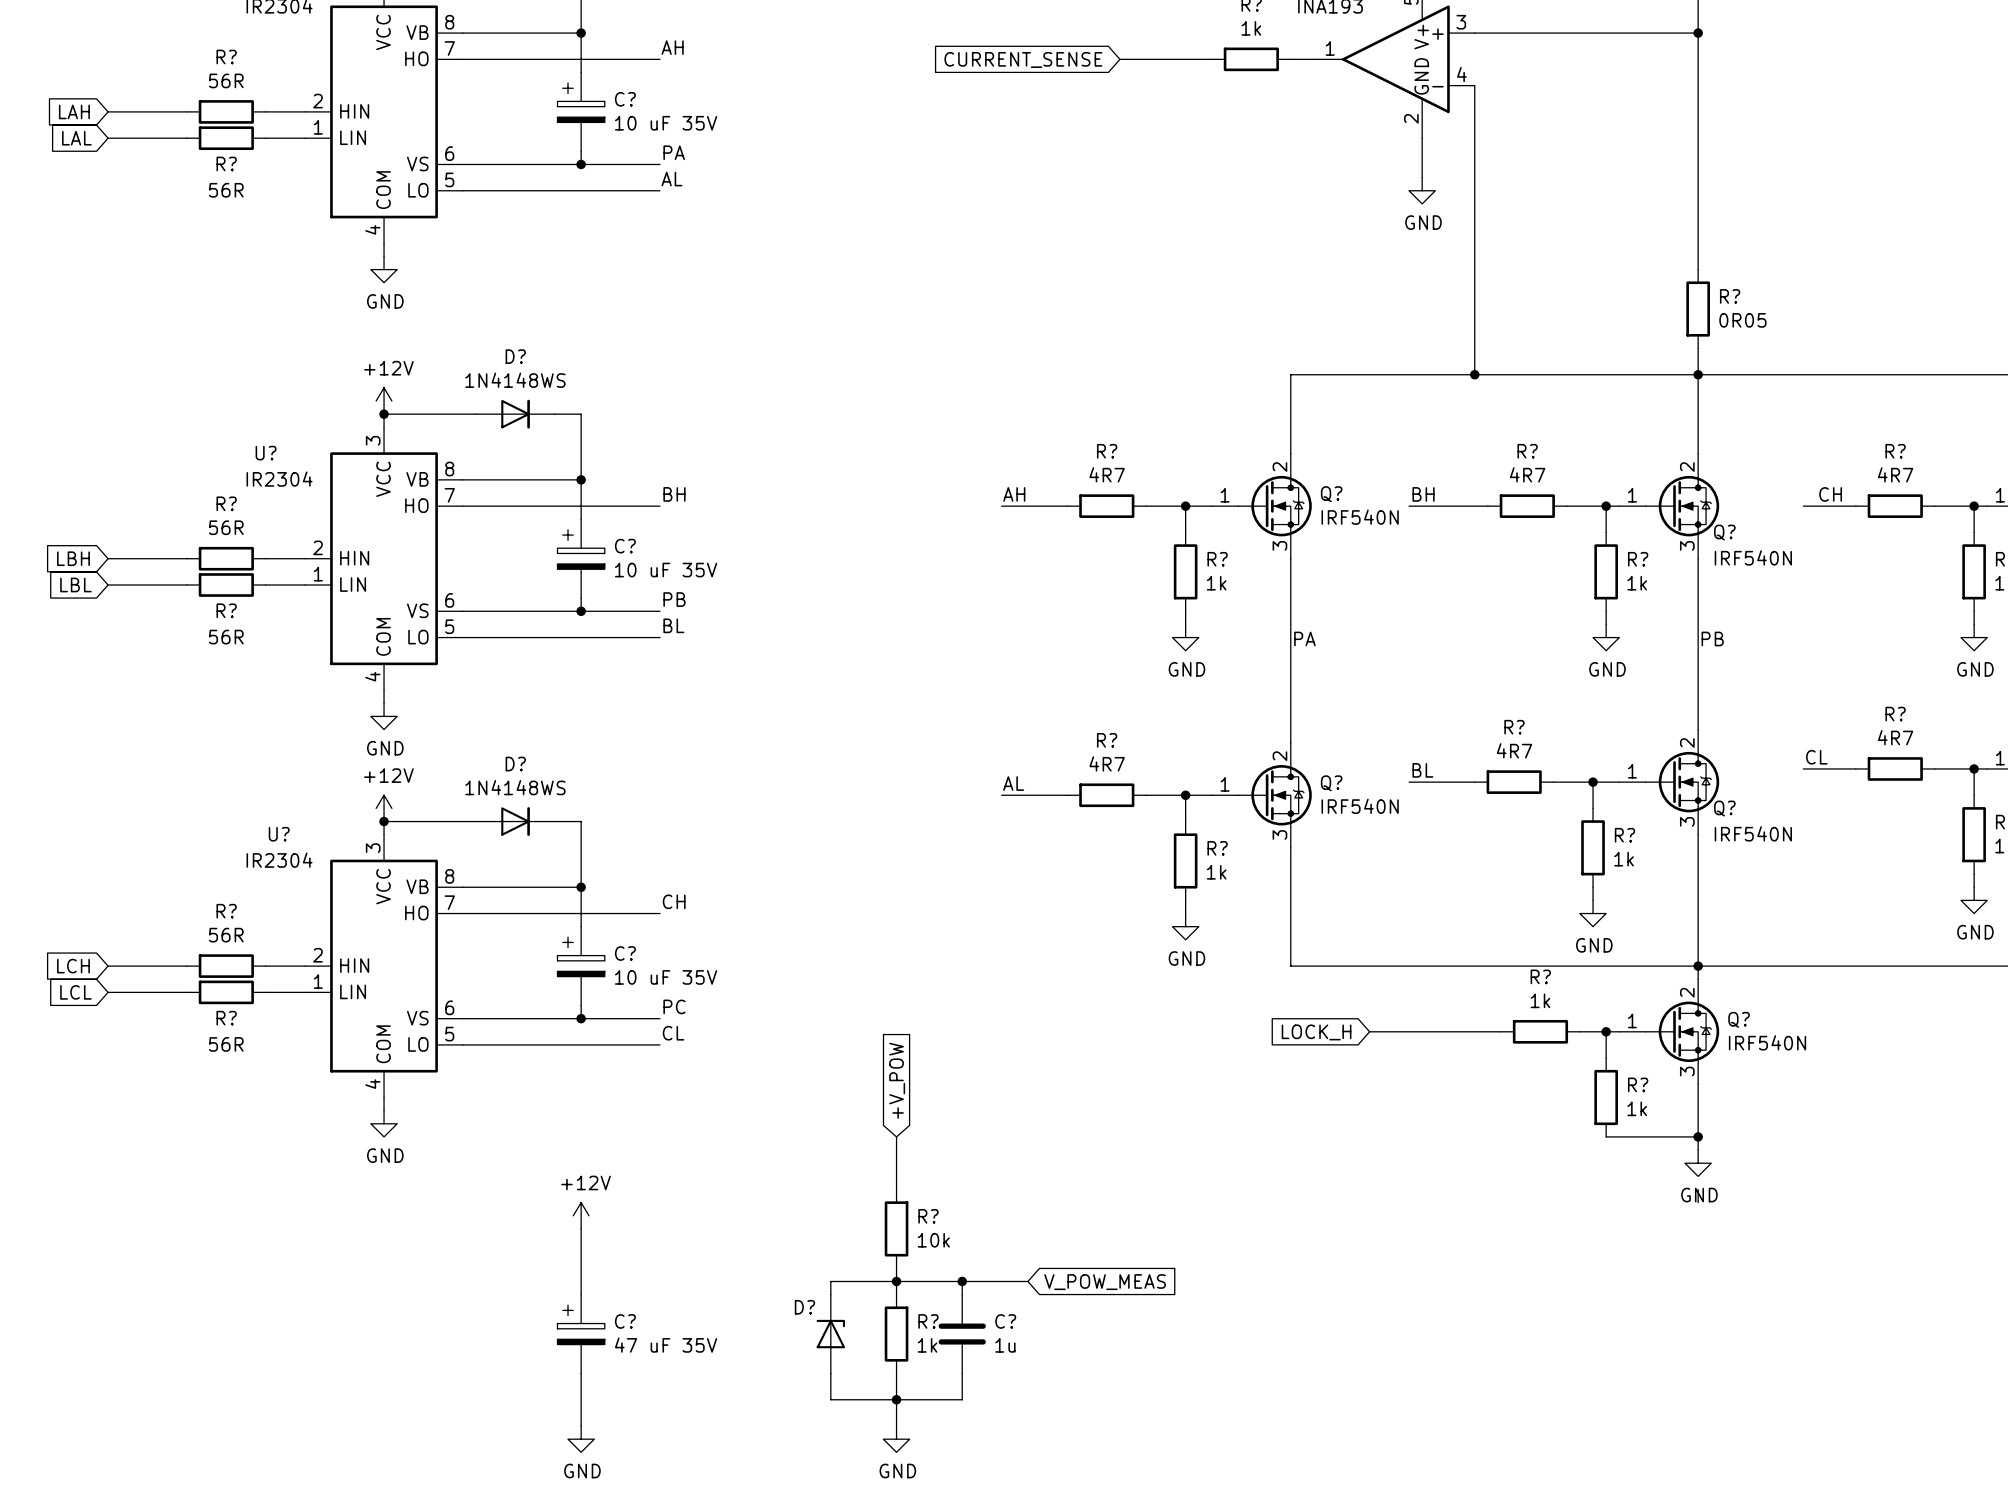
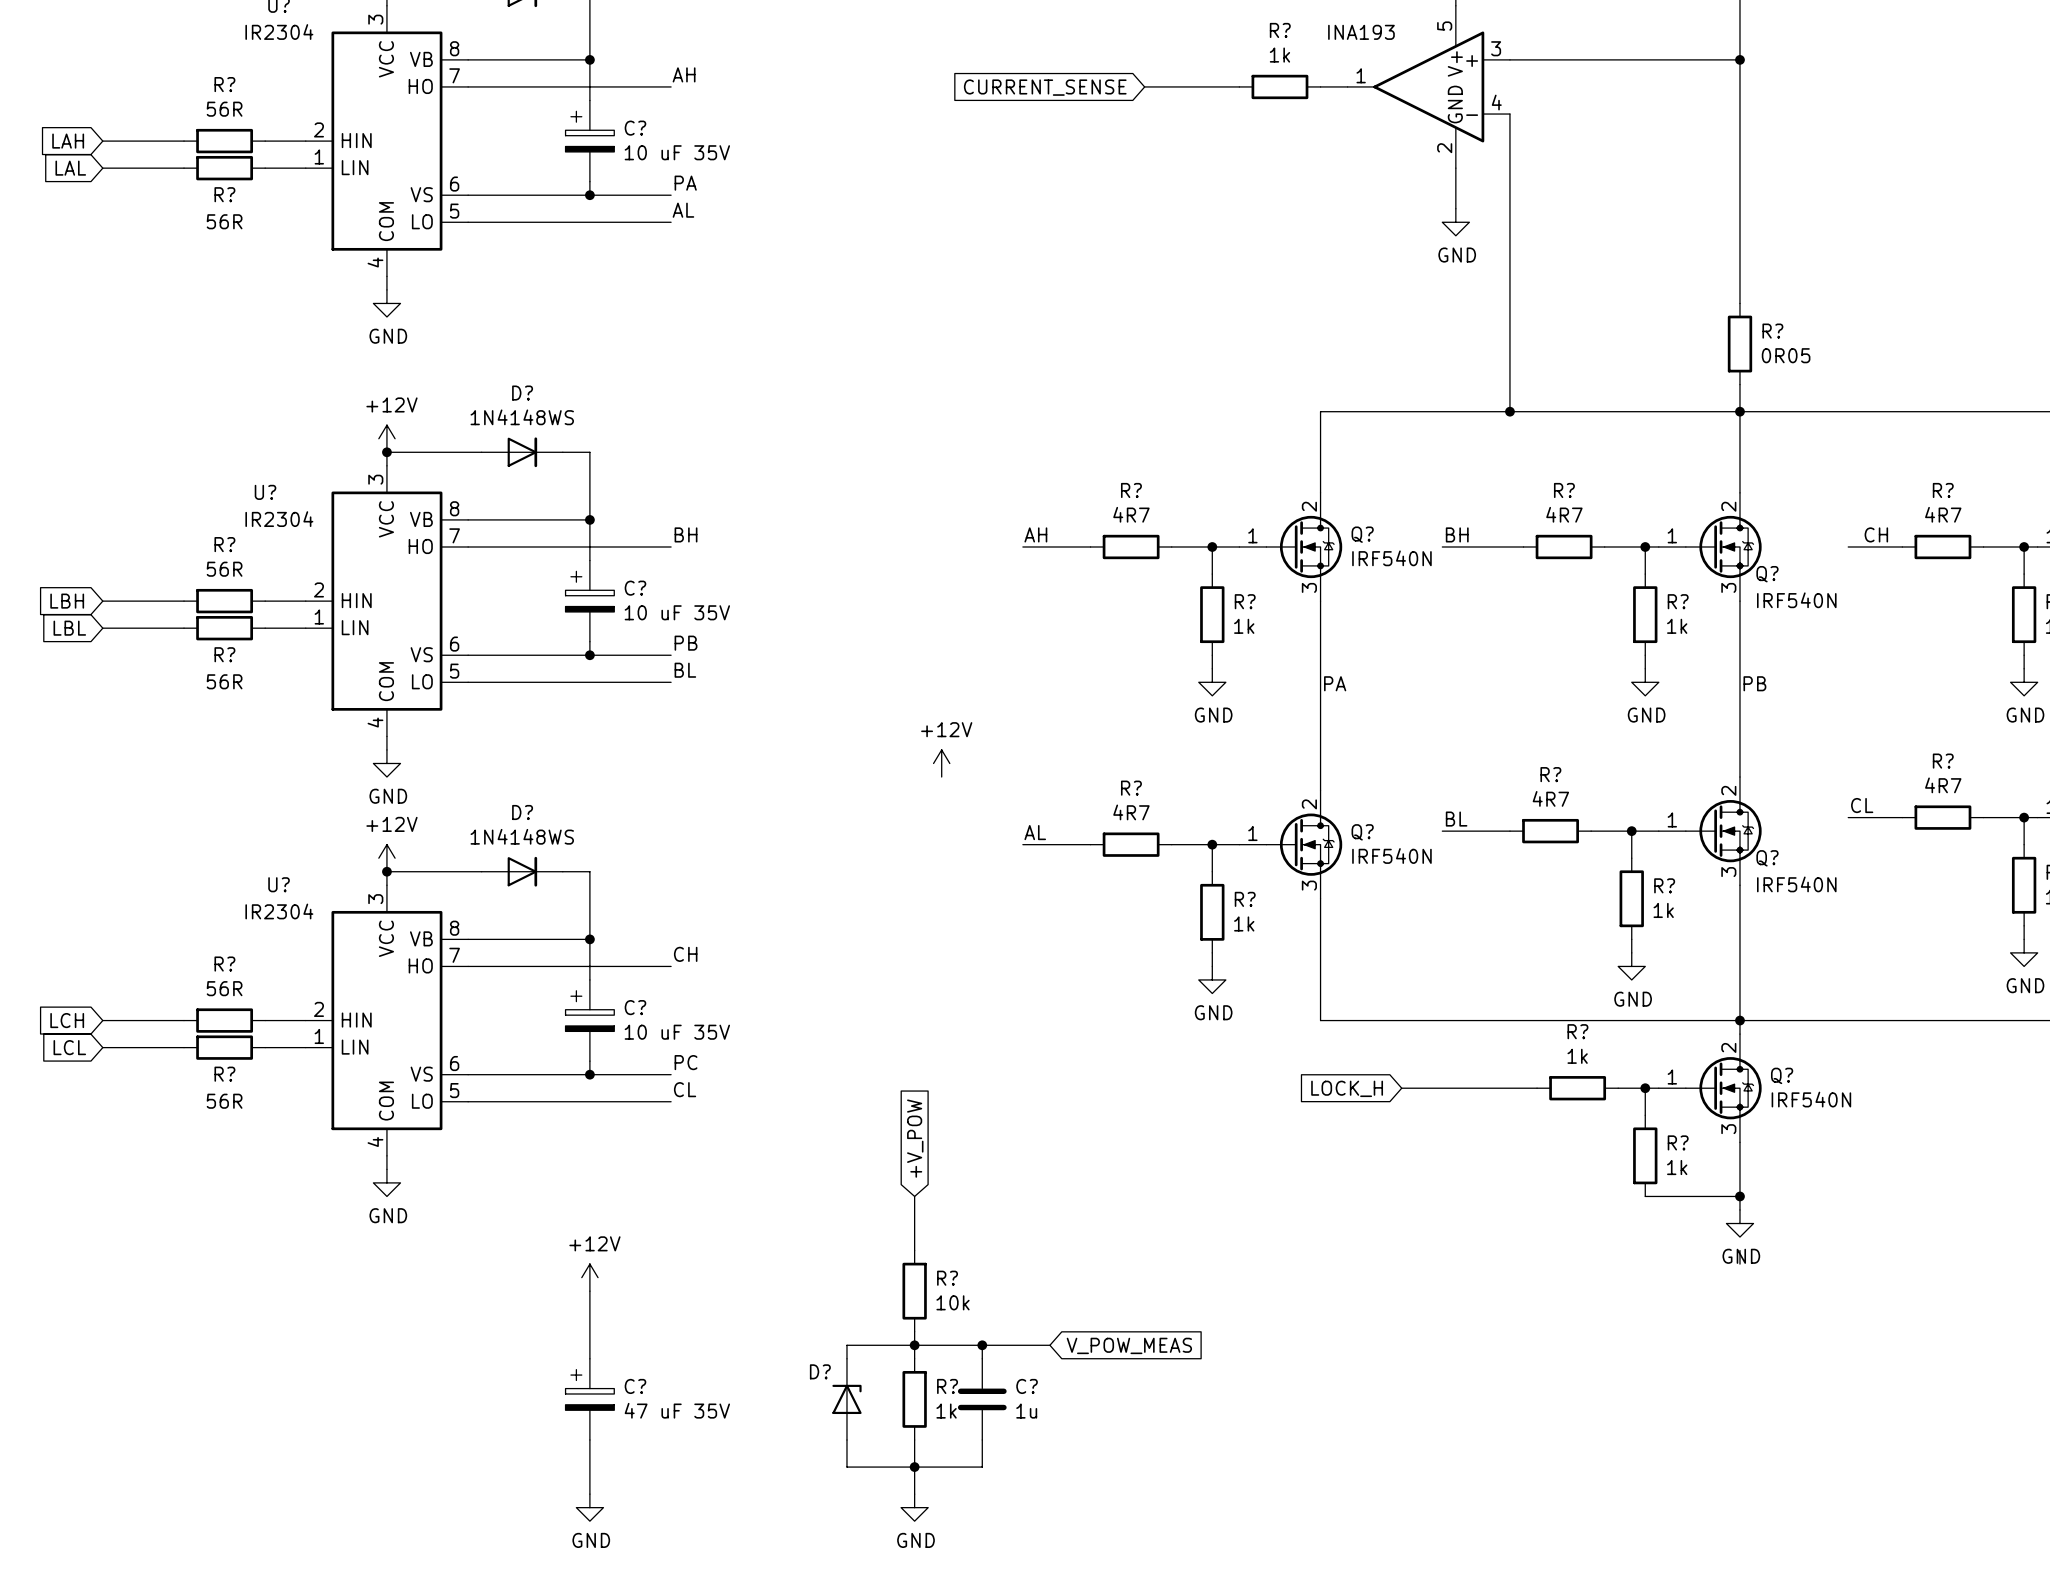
power symbol: none -> +12V (941, 763)

